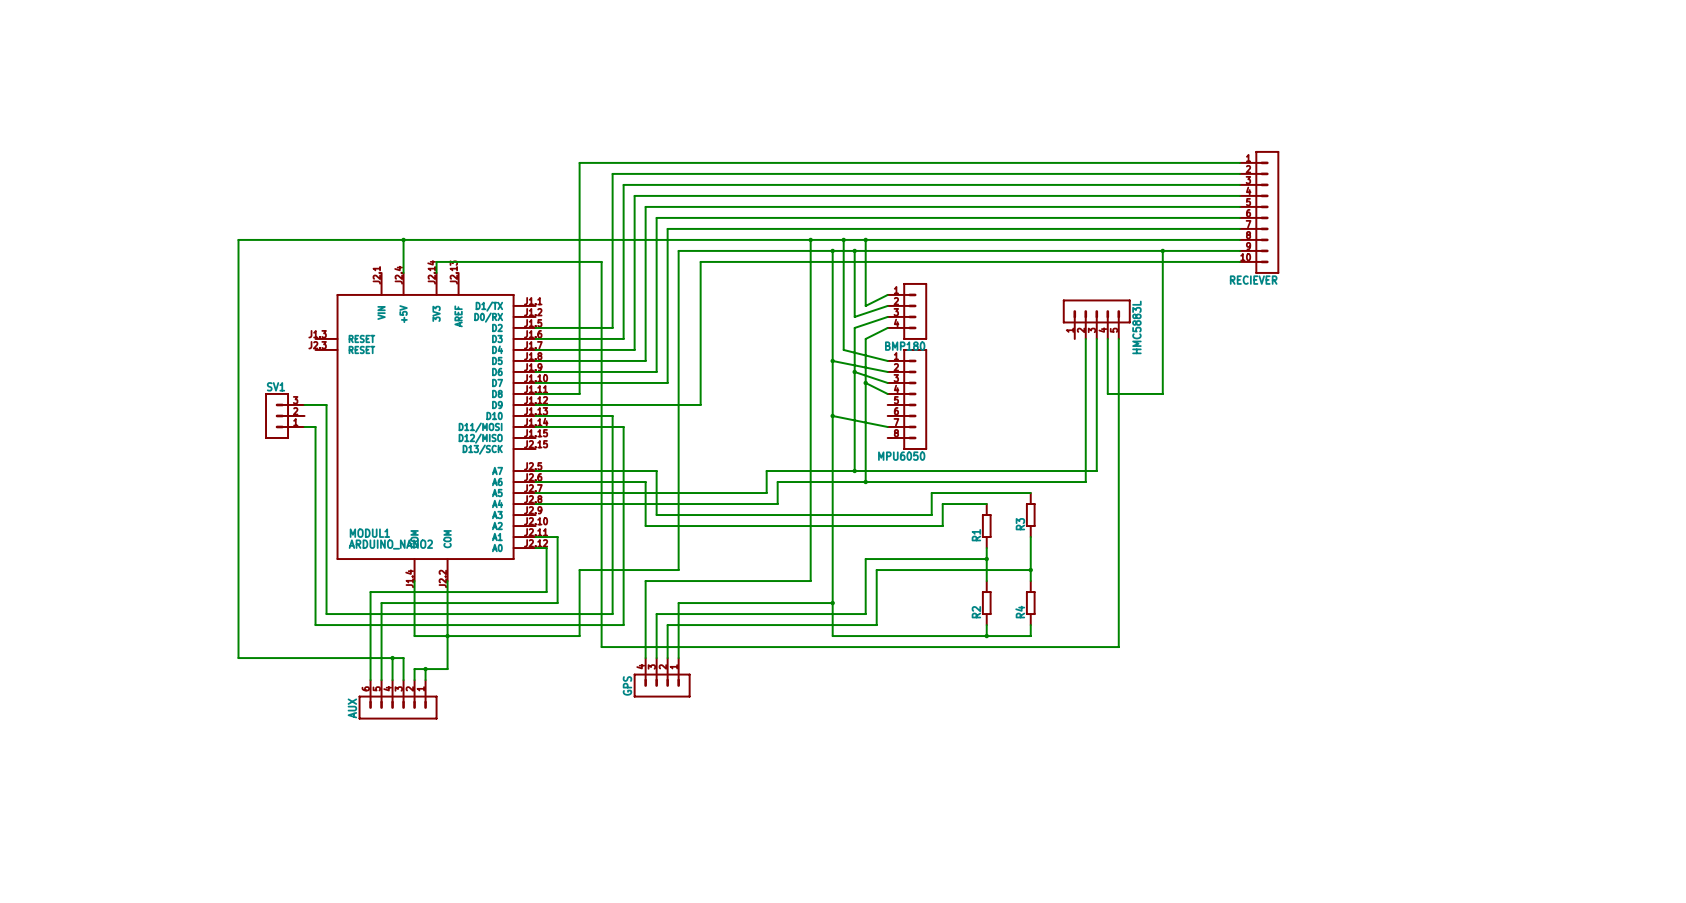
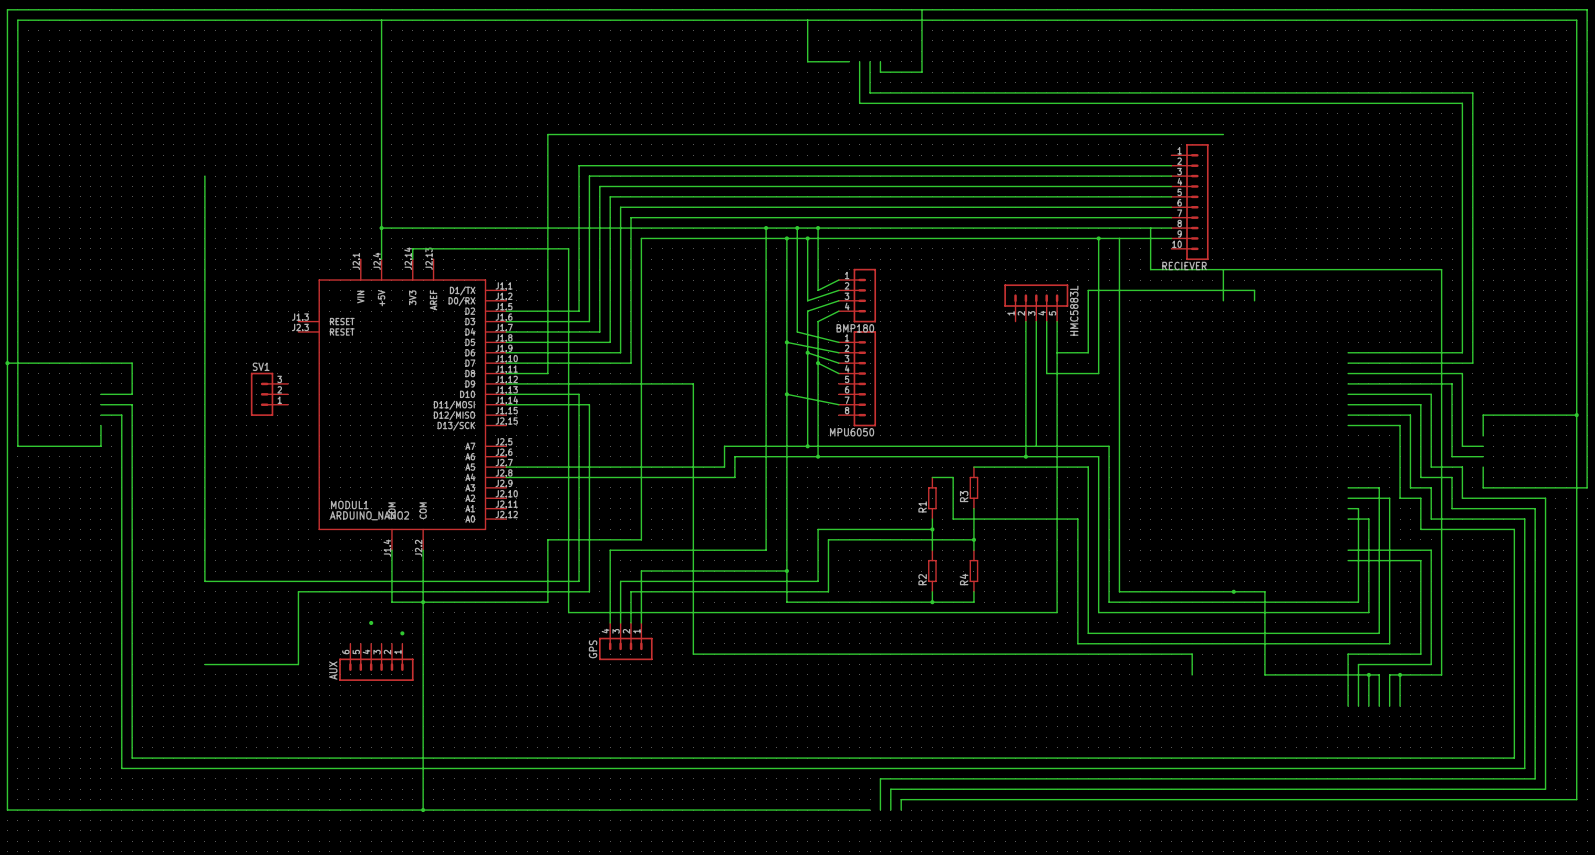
wire: none -> (921, 9) (921, 72) (880, 72) (880, 61)
wire: none -> (807, 20) (807, 61) (849, 61)
wire: none -> (859, 61) (859, 103) (1462, 103) (1462, 352) (1348, 352)
wire: none -> (870, 61) (870, 92) (1472, 92) (1472, 363) (1348, 363)
wire: (579, 162) (1239, 162) -> (547, 155) (547, 134) (1223, 134)
wire: (403, 239) (238, 239) (238, 658) (403, 658) (403, 680) -> (381, 228) (381, 20)
wire: none -> (1150, 228) (1150, 269) (1441, 269) (1441, 674) (1389, 674) (1389, 706)
wire: none -> (1119, 238) (1119, 591) (1264, 591) (1264, 674) (1379, 674) (1379, 706)
wire: (1239, 261) (700, 261) (700, 404) -> (1192, 674) (1192, 654) (693, 654) (693, 383) (662, 383)
wire: none -> (1223, 269) (1223, 300)
wire: none -> (1254, 300) (1254, 290) (1088, 290) (1088, 352) (1057, 352)
wire: none -> (7, 363) (132, 363) (132, 394) (100, 394)
junction: none -> (7, 363)
wire: none -> (1348, 373) (1462, 373) (1462, 446) (1483, 446)
wire: (304, 404) (326, 404) (326, 614) -> (204, 176) (204, 581) (308, 581)
wire: none -> (1348, 383) (1452, 383) (1452, 456) (1483, 456)
wire: none -> (1348, 394) (1431, 394) (1431, 467) (1462, 467) (1462, 498) (1545, 498) (1545, 789) (890, 789) (890, 810)
wire: none -> (100, 404) (132, 404) (132, 758) (1514, 758) (1514, 529) (1420, 529) (1420, 498) (1400, 498) (1400, 425) (1348, 425)
wire: (304, 426) (315, 426) (315, 625) -> (204, 664) (298, 664) (298, 591)
wire: none -> (1348, 404) (1420, 404) (1420, 477) (1452, 477) (1452, 508) (1535, 508) (1535, 778) (880, 778) (880, 810)
wire: none -> (100, 415) (121, 415) (121, 768) (1524, 768) (1524, 519) (1431, 519) (1431, 487) (1410, 487) (1410, 415) (1348, 415)
wire: none -> (1576, 415) (1483, 415) (1483, 435)
junction: none -> (1576, 415)
wire: none -> (100, 425) (100, 446) (17, 446) (17, 20) (1576, 20) (1576, 799) (901, 799) (901, 810)
wire: (535, 471) (656, 471) (656, 515) (931, 515) (931, 493) (1030, 493) -> (1348, 487) (1379, 487) (1379, 633) (1088, 633) (1088, 467) (973, 467)
wire: none -> (1036, 446) (1109, 446) (1109, 602) (1358, 602) (1358, 508) (1348, 508)
wire: (535, 482) (645, 482) (645, 526) (942, 526) (942, 504) (986, 504) -> (1348, 498) (1389, 498) (1389, 643) (1077, 643) (1077, 519) (953, 519) (953, 477) (932, 477)
wire: none -> (1025, 456) (1098, 456) (1098, 612) (1368, 612) (1368, 519) (1348, 519)
junction: none -> (1025, 456)
wire: none -> (1483, 467) (1483, 487) (1587, 487) (1587, 9) (7, 9) (7, 810) (870, 810)
wire: (535, 537) (557, 537) (557, 603) (381, 603) (381, 680) -> none
wire: (535, 548) (546, 548) (546, 592) (370, 592) (370, 680) -> none
wire: none -> (1348, 550) (1431, 550) (1431, 664) (1358, 664) (1358, 706)
wire: none -> (1348, 560) (1420, 560) (1420, 654) (1348, 654) (1348, 706)
junction: none -> (1233, 591)
wire: (392, 658) (392, 680) -> none
wire: (425, 669) (425, 680) -> none
wire: (447, 669) (414, 669) (414, 680) -> (423, 633) (423, 810)
wire: none -> (1368, 674) (1368, 706)
junction: none -> (1368, 674)
wire: none -> (1400, 674) (1400, 706)
junction: none -> (1400, 674)
junction: none -> (423, 810)

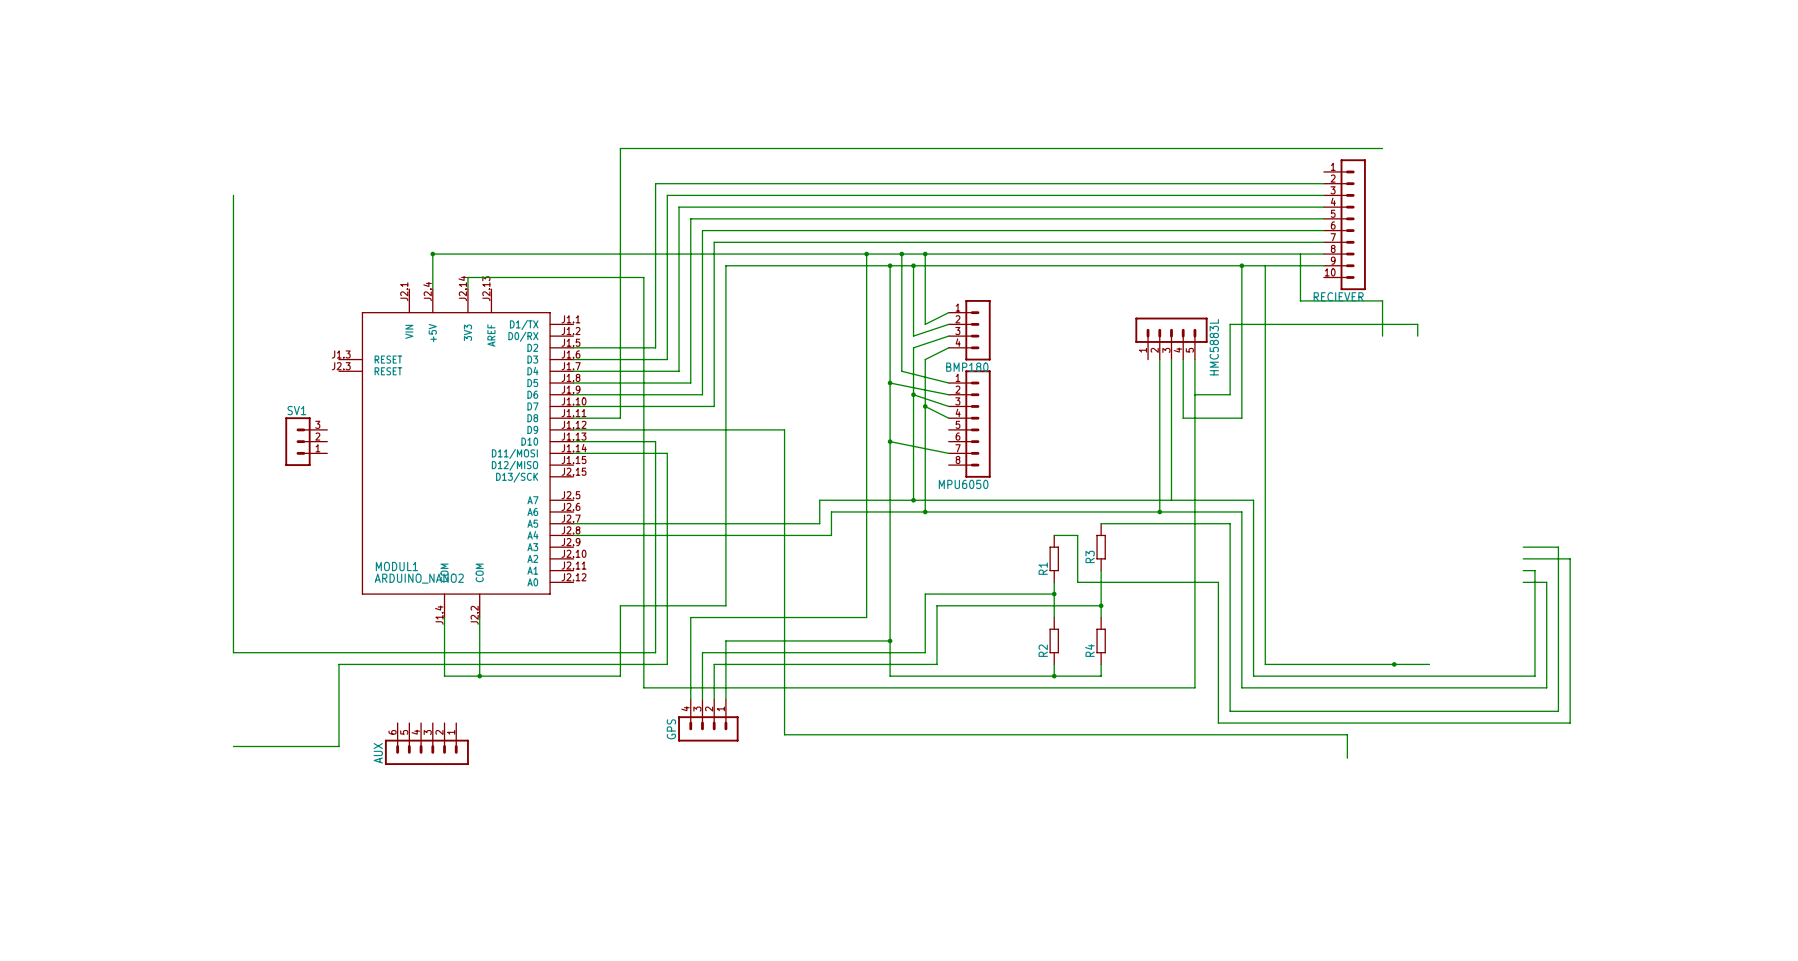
wire: (921, 9) (921, 72) (880, 72) (880, 61) -> none
wire: (381, 20) (381, 228) -> none
wire: (807, 20) (807, 61) (849, 61) -> none
wire: (859, 61) (859, 103) (1462, 103) (1462, 352) (1348, 352) -> none
wire: (870, 61) (870, 92) (1472, 92) (1472, 363) (1348, 363) -> none
wire: (1223, 269) (1441, 269) (1441, 674) (1389, 674) (1389, 706) -> none
wire: (7, 363) (132, 363) (132, 394) (100, 394) -> none
junction: (7, 363) -> none
wire: (1348, 373) (1462, 373) (1462, 446) (1483, 446) -> none
wire: (1348, 383) (1452, 383) (1452, 456) (1483, 456) -> none
wire: (1348, 394) (1431, 394) (1431, 467) (1462, 467) (1462, 498) (1545, 498) (1545, 789) (890, 789) (890, 810) -> none
wire: (100, 404) (132, 404) (132, 758) (1514, 758) (1514, 529) (1420, 529) (1420, 498) (1400, 498) (1400, 425) (1348, 425) -> none
wire: (1348, 404) (1420, 404) (1420, 477) (1452, 477) (1452, 508) (1535, 508) (1535, 778) (880, 778) (880, 810) -> none
wire: (100, 415) (121, 415) (121, 768) (1524, 768) (1524, 519) (1431, 519) (1431, 487) (1410, 487) (1410, 415) (1348, 415) -> none
wire: (1576, 415) (1483, 415) (1483, 435) -> none
junction: (1576, 415) -> none
wire: (100, 425) (100, 446) (17, 446) (17, 20) (1576, 20) (1576, 799) (901, 799) (901, 810) -> none
wire: (1483, 467) (1483, 487) (1587, 487) (1587, 9) (7, 9) (7, 810) (870, 810) -> none
wire: (1348, 550) (1431, 550) (1431, 664) (1358, 664) (1358, 706) -> none
wire: (1348, 560) (1420, 560) (1420, 654) (1348, 654) (1348, 706) -> none
wire: (1264, 591) (1264, 674) (1379, 674) (1379, 706) -> none
wire: (423, 602) (423, 810) -> none
junction: (371, 622) -> none
junction: (402, 633) -> none
wire: (1368, 674) (1368, 706) -> none
junction: (1368, 674) -> none
wire: (1400, 674) (1400, 706) -> none
junction: (1400, 674) -> none
junction: (423, 810) -> none

